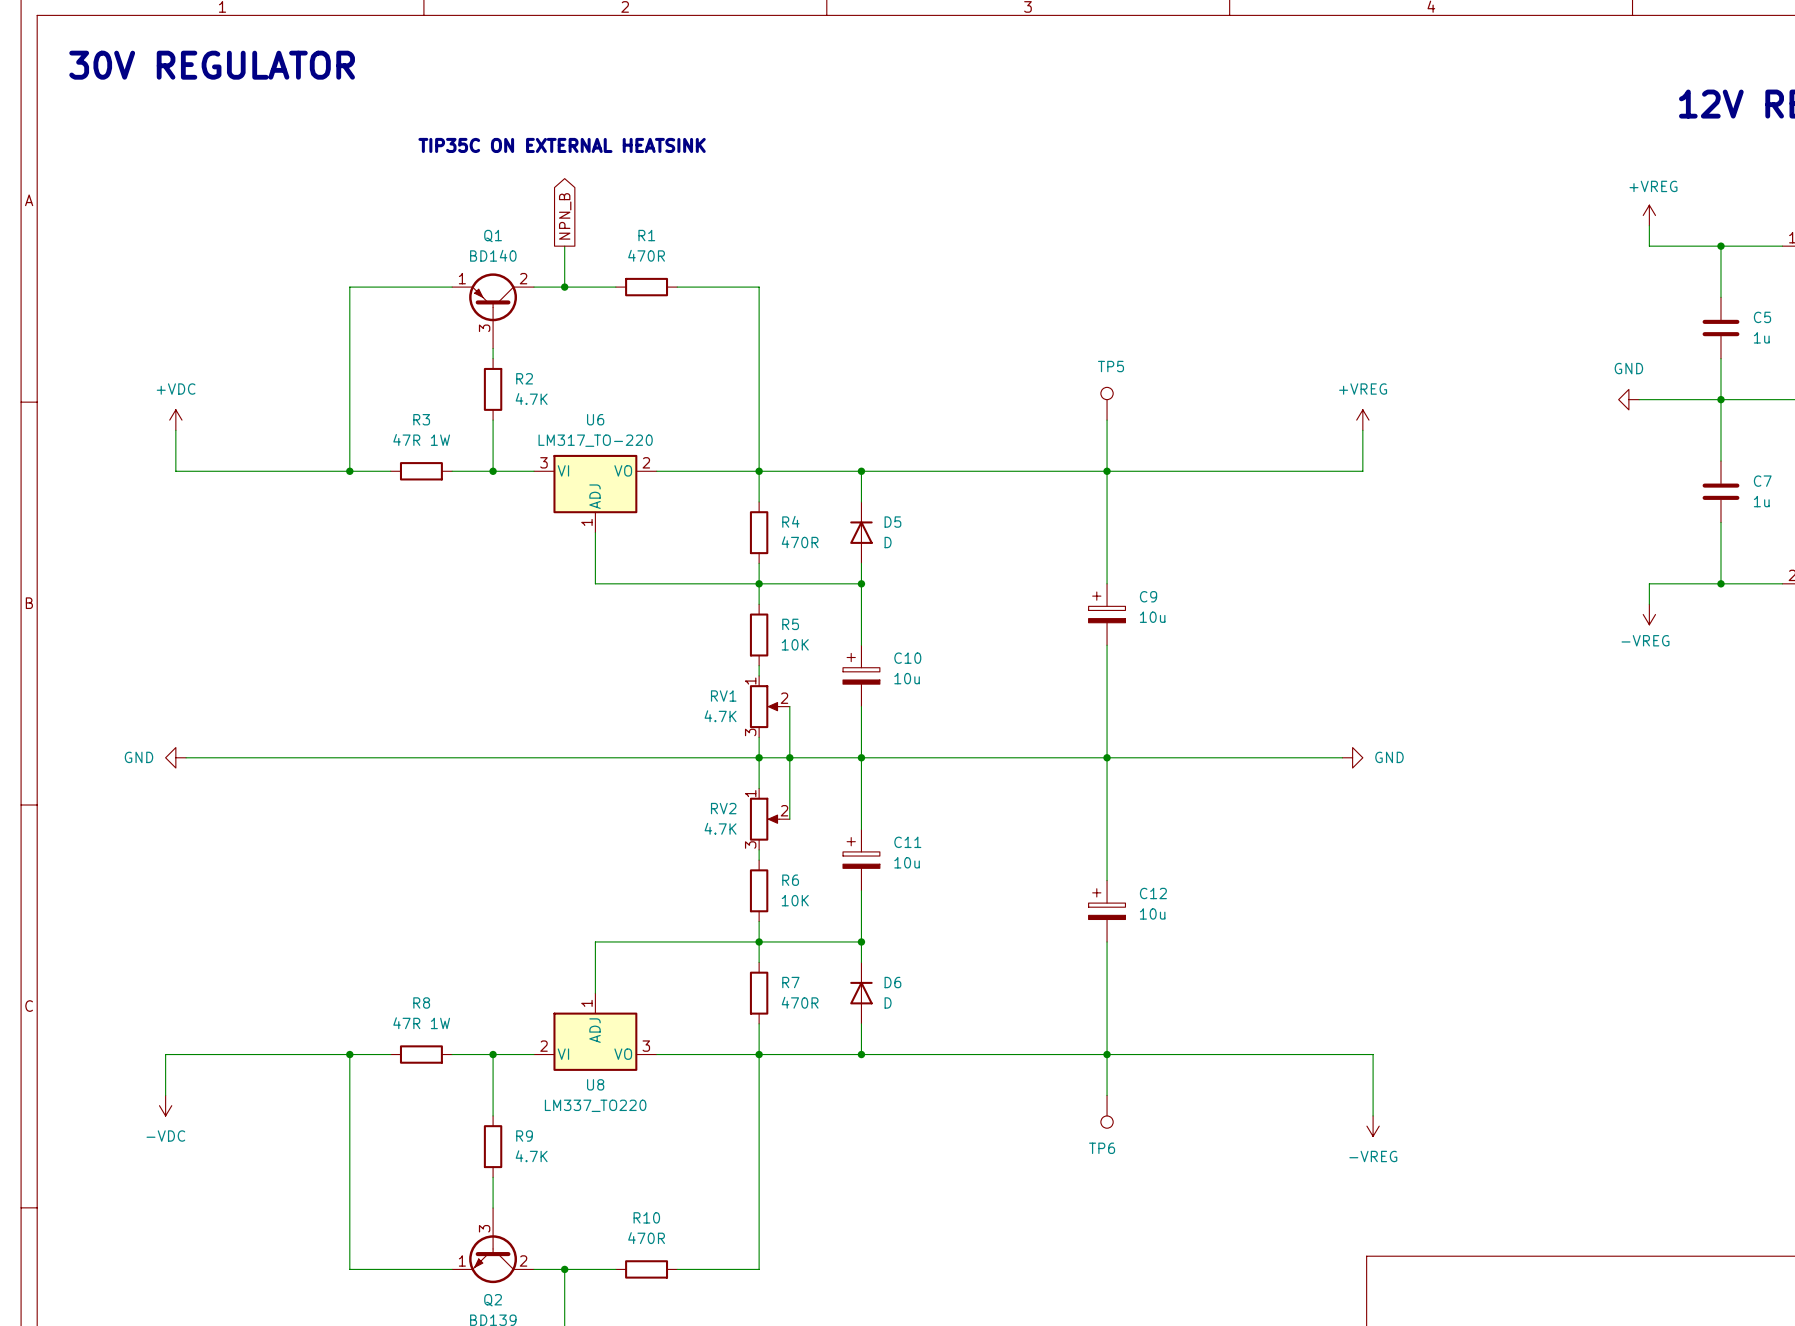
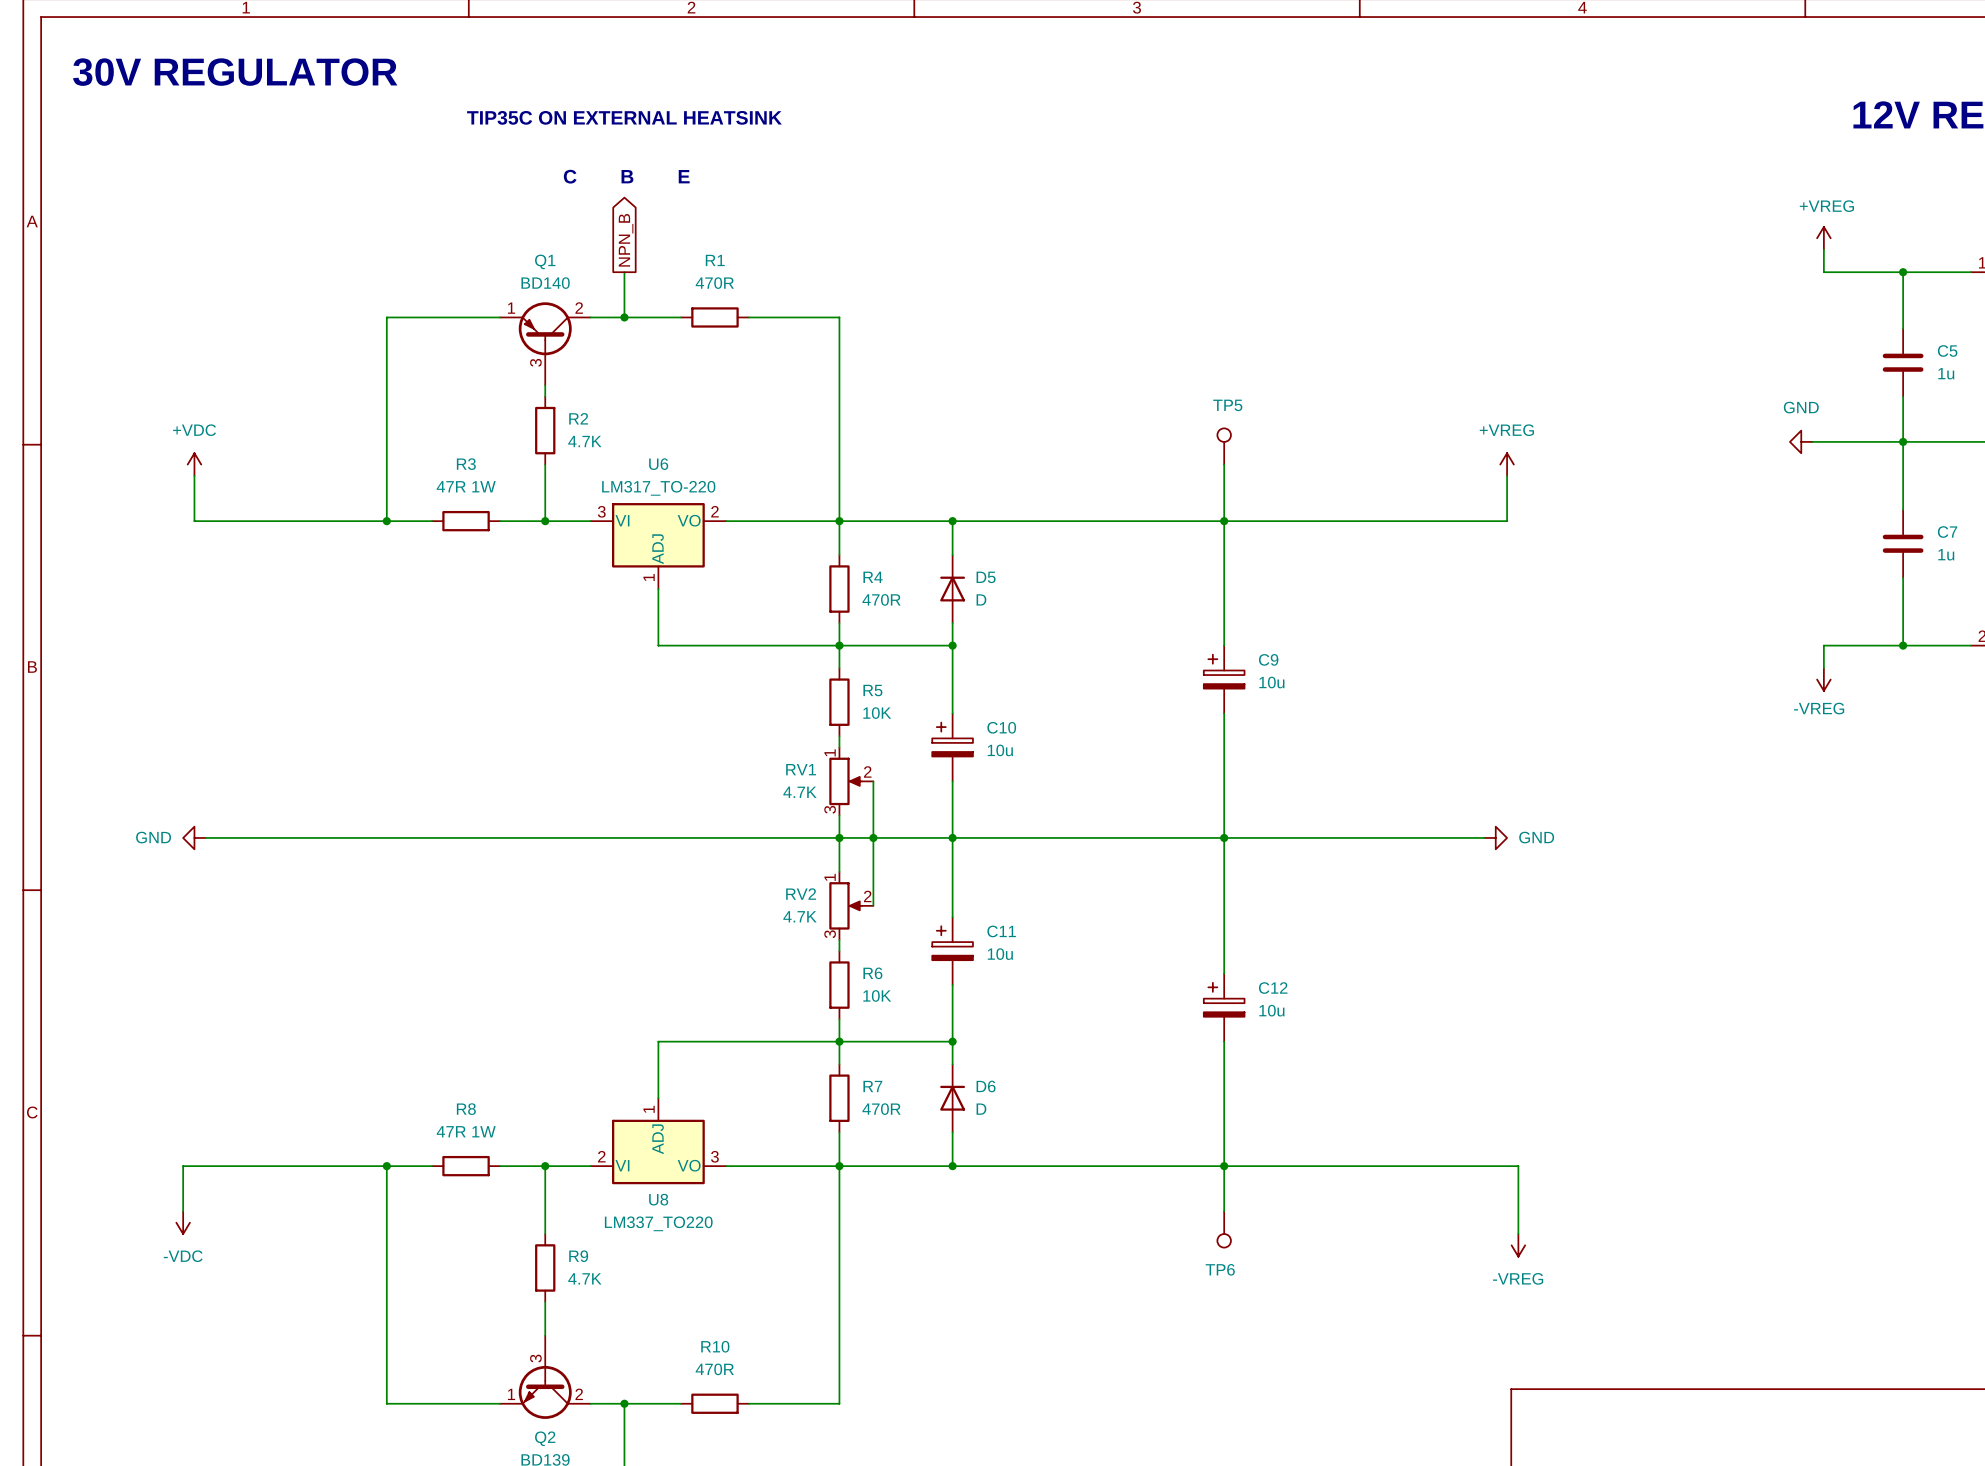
text position: TIP35C ON EXTERNAL HEATSINK (562, 145) -> TIP35C ON EXTERNAL HEATSINK (624, 117)
text: none -> C B E (626, 176)

